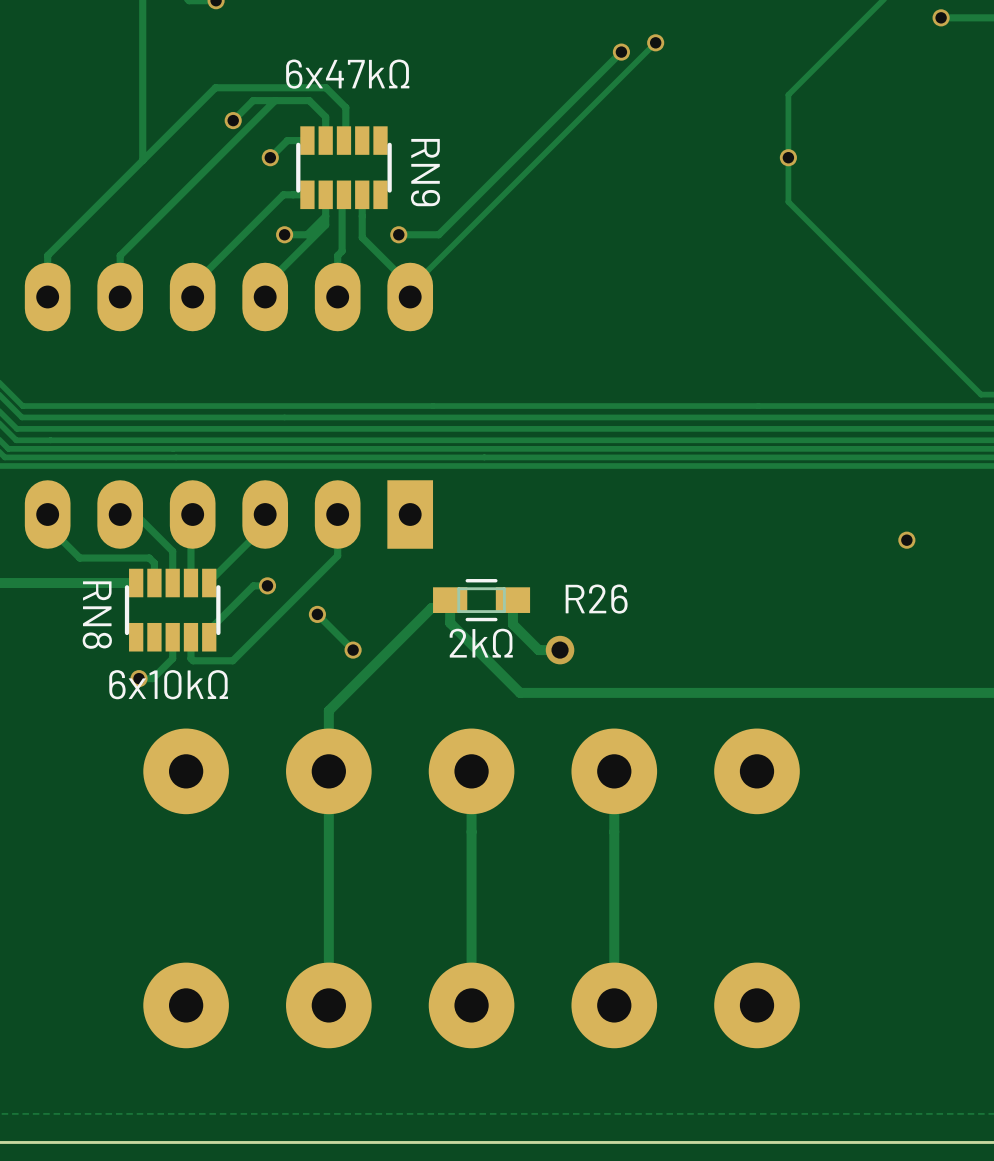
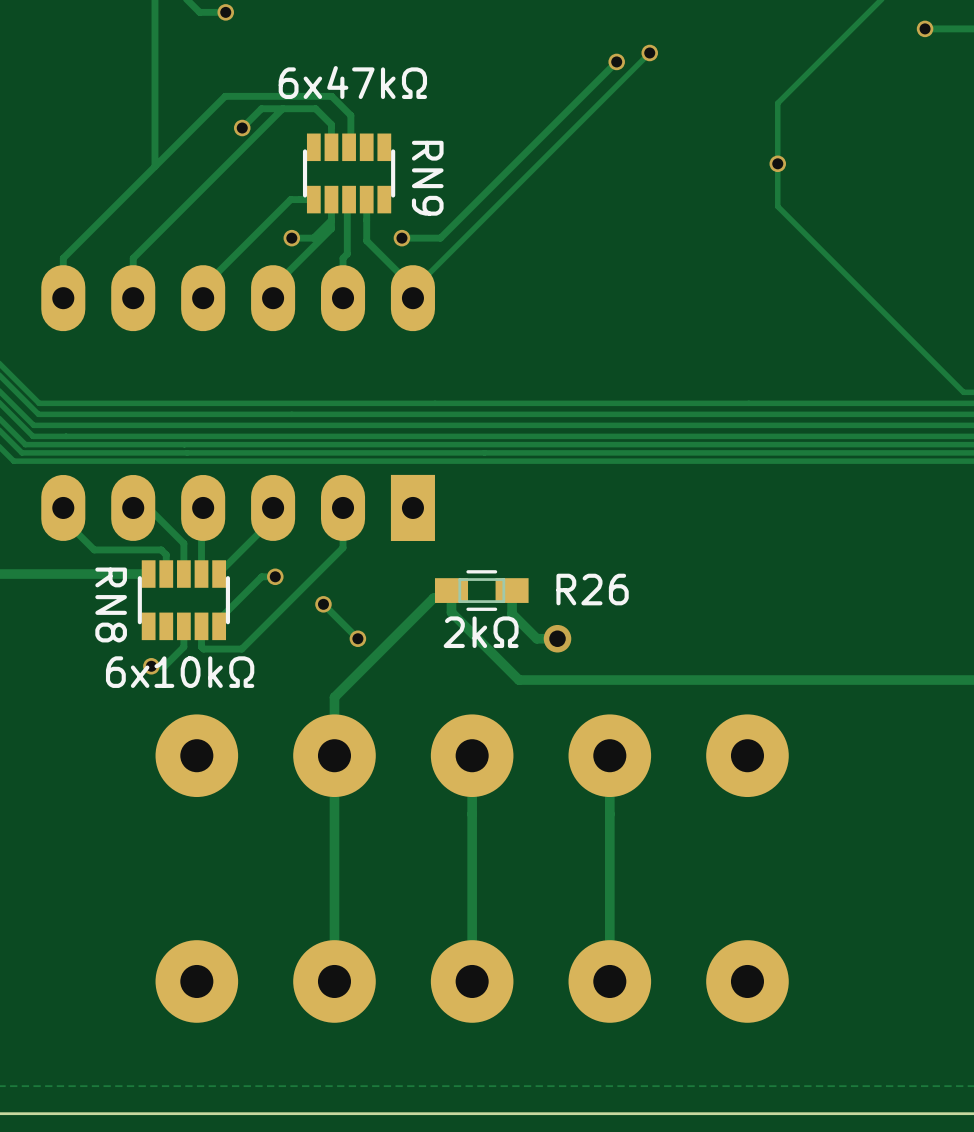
track: (307, 140) (287, 140) (270, 157) -> none
via: (270, 157) -> none
via: (906, 540) -> none

